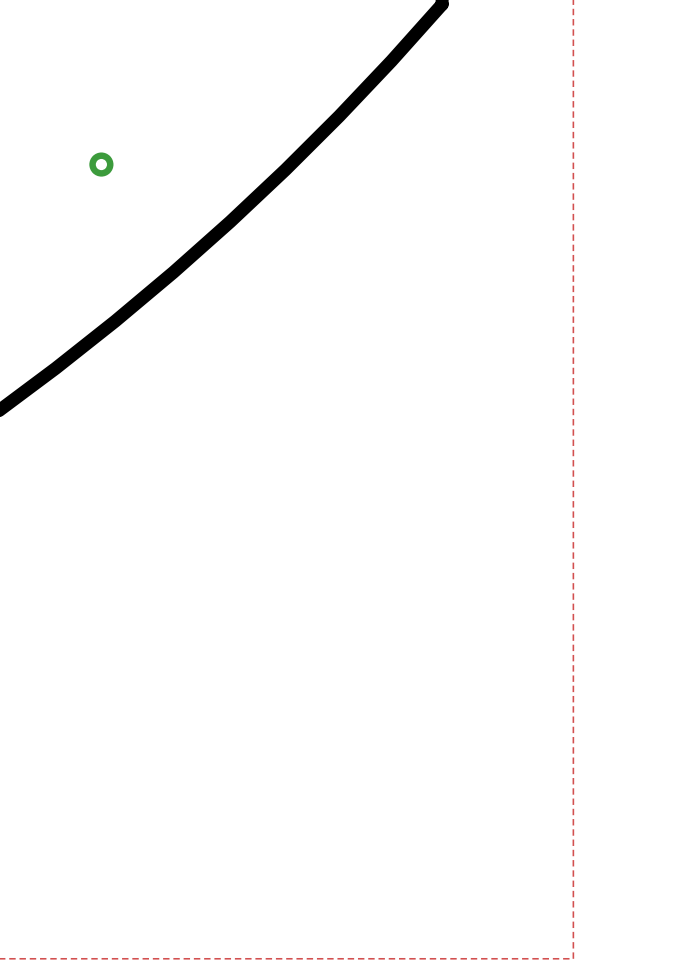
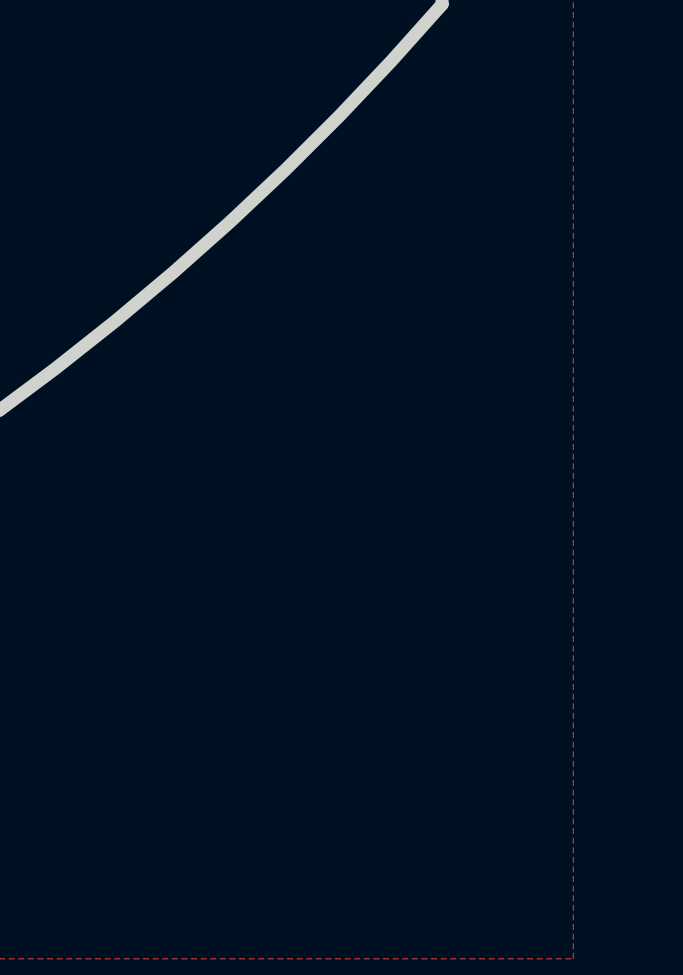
via: (101, 164) -> none

